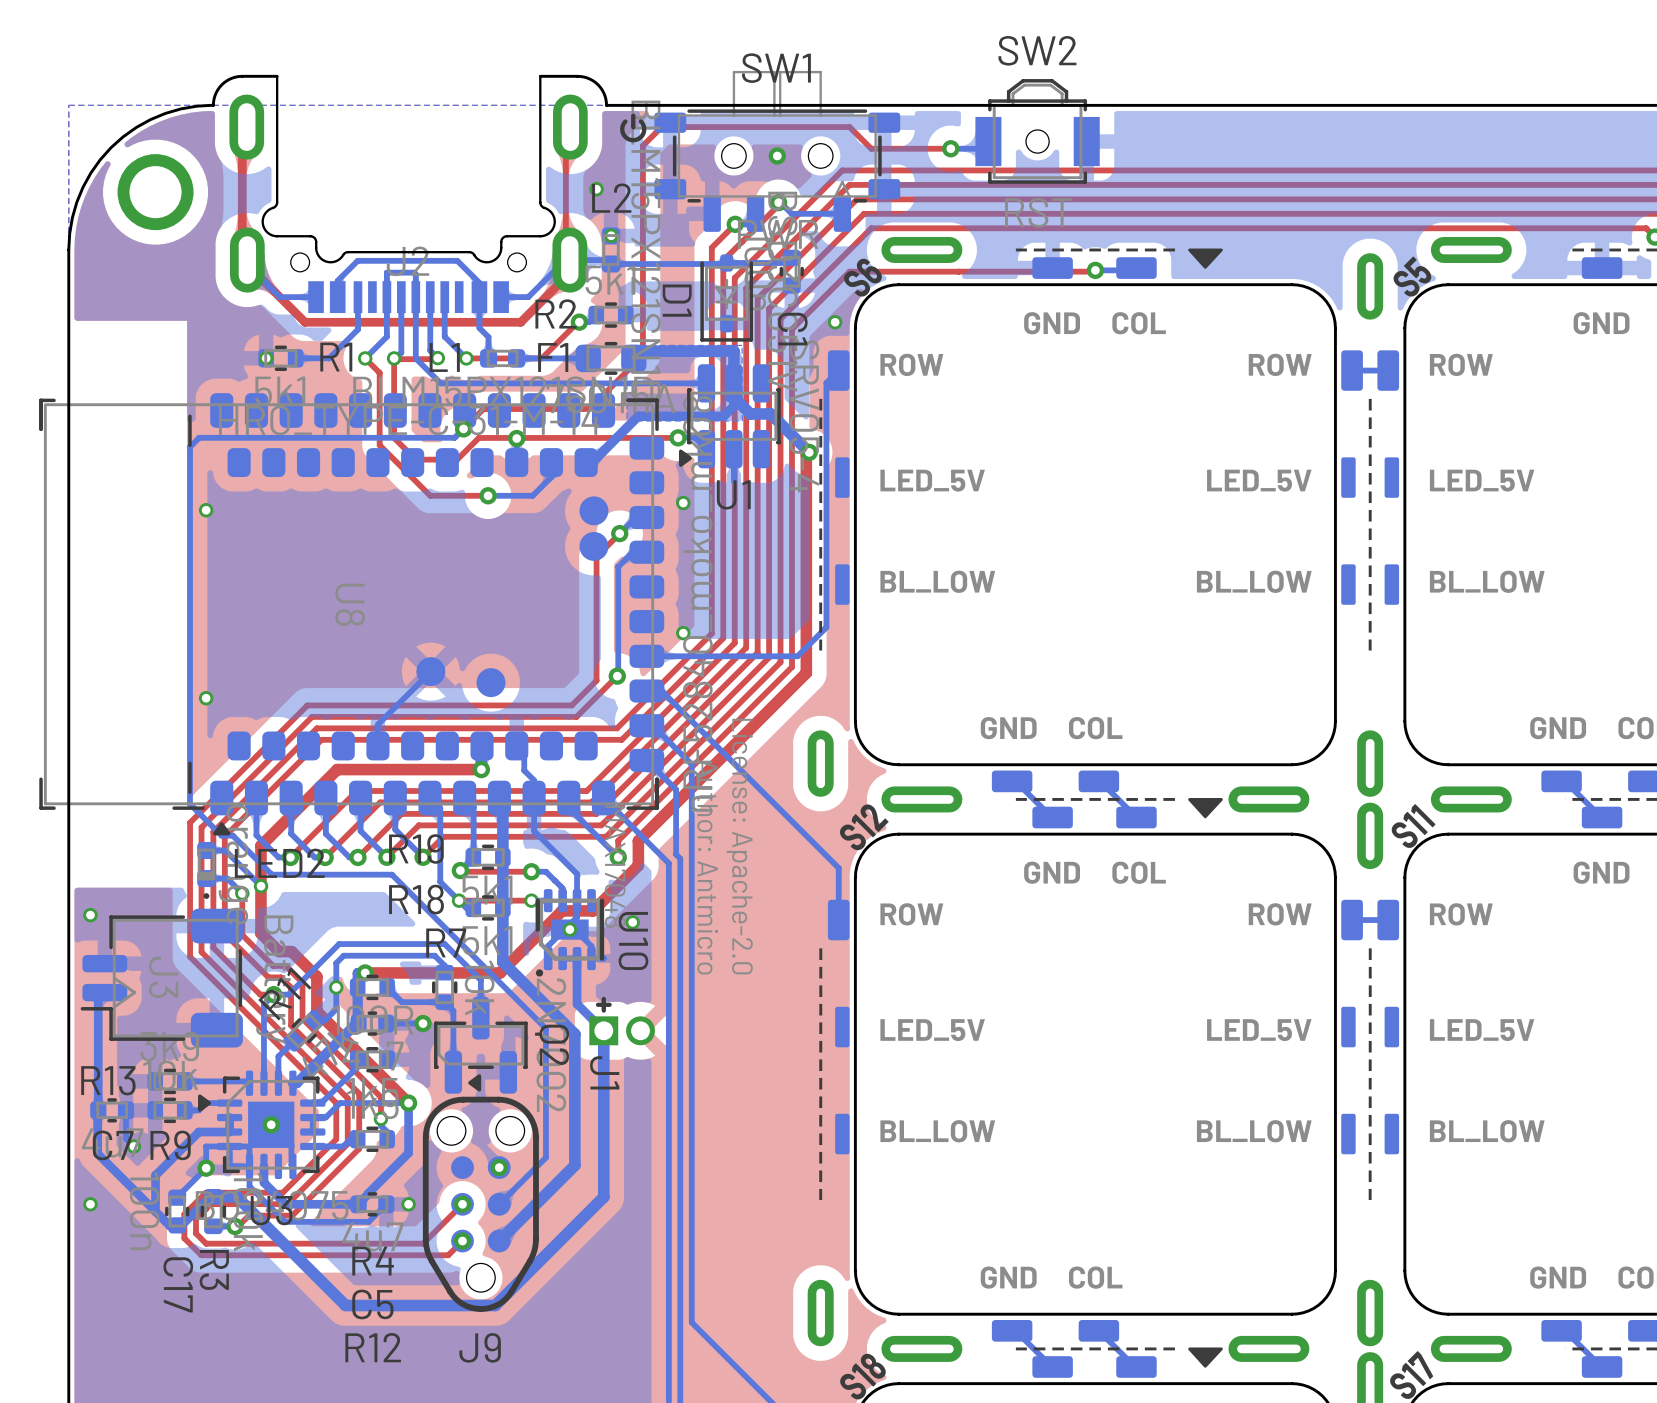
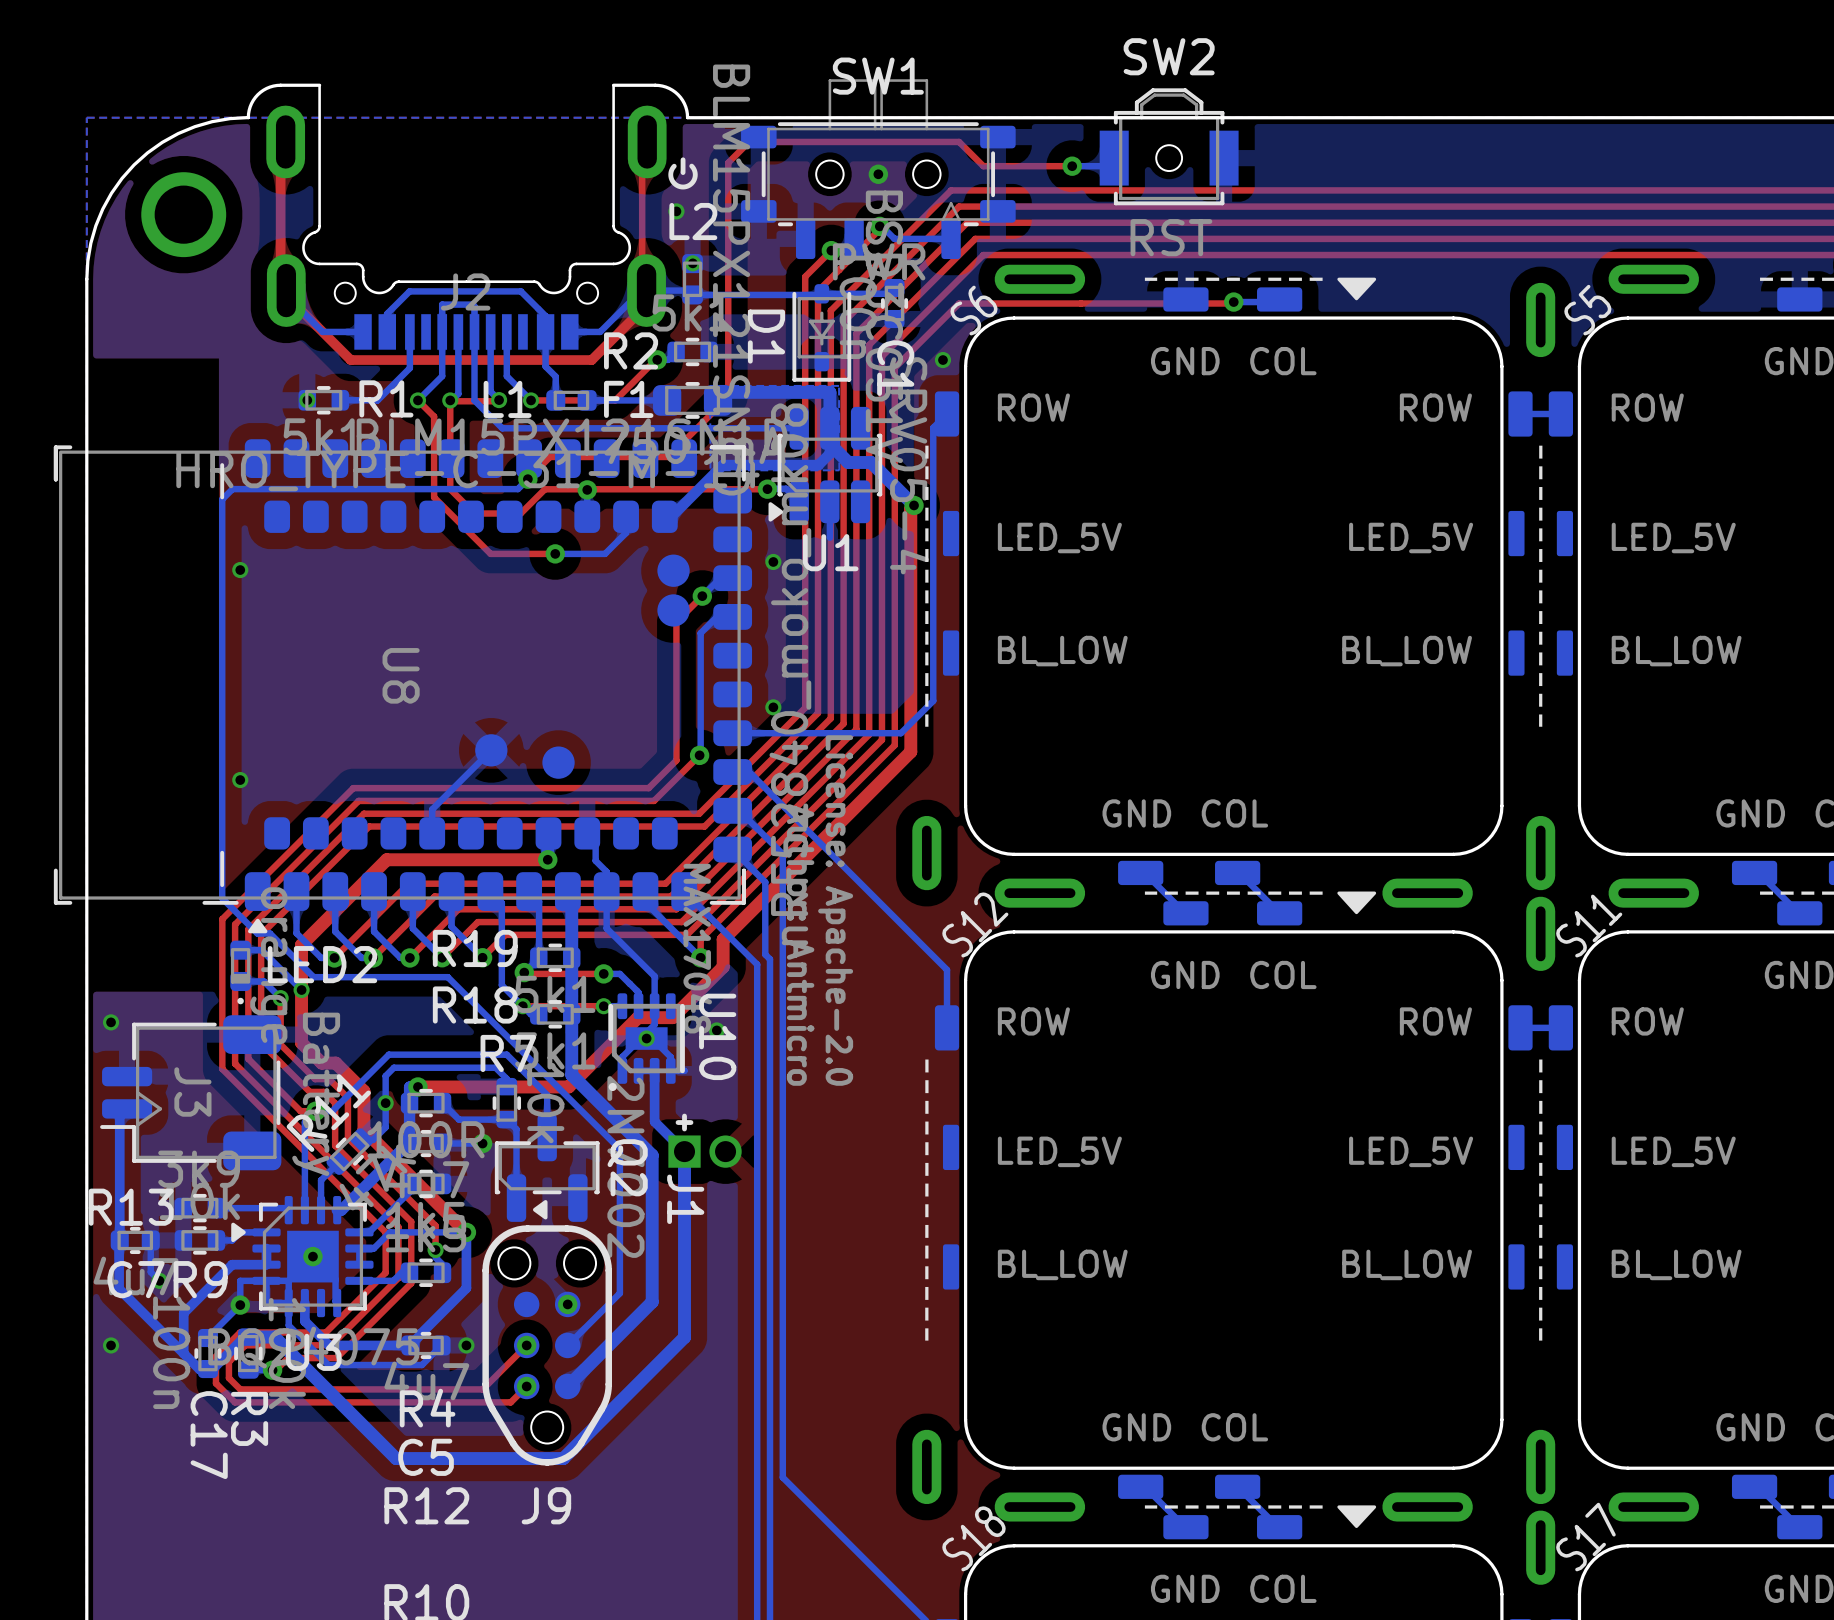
line: (633, 115) (633, 127) -> (683, 159) (683, 172)
line: (641, 121) (644, 127) (643, 133) (638, 138) (633, 140) (627, 138) (623, 133) (622, 126) (625, 121) -> (691, 166) (694, 171) (694, 179) (690, 184) (683, 187) (676, 185) (671, 179) (670, 173) (674, 166)

